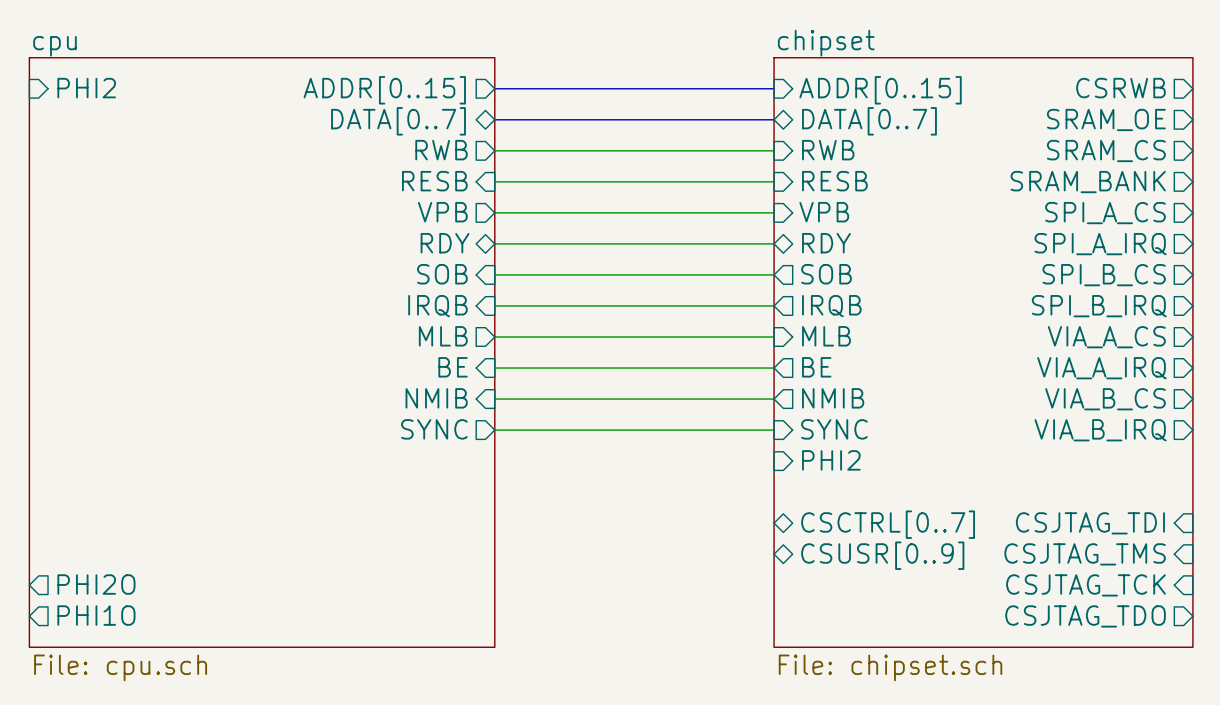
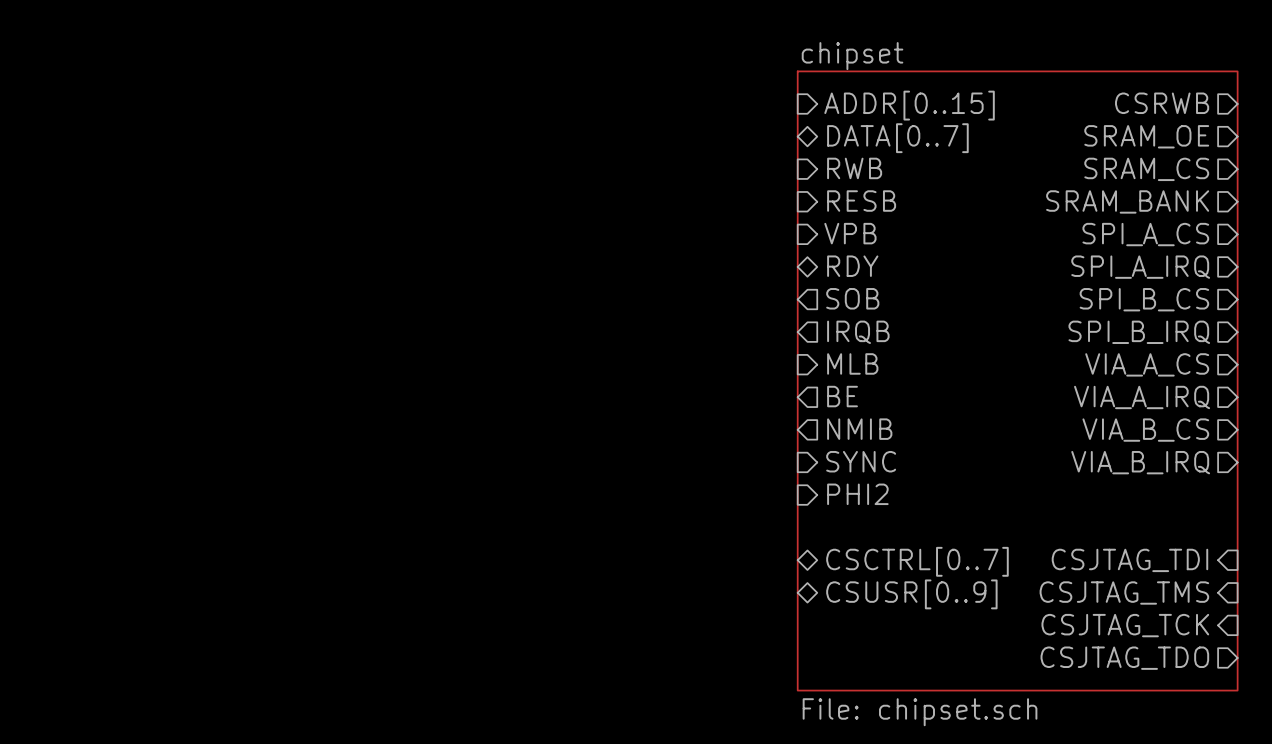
sheet pin: PHI2 (86, 88) -> none
bus: (494, 88) (774, 88) -> none
sheet pin: ADDR[0..15] (384, 90) -> none
bus: (494, 119) (774, 119) -> none
sheet pin: DATA[0..7] (398, 121) -> none
sheet pin: RWB (441, 150) -> none
wire: (494, 150) (774, 150) -> none
sheet pin: RESB (434, 181) -> none
wire: (494, 181) (774, 181) -> none
sheet pin: VPB (442, 212) -> none
wire: (494, 212) (774, 212) -> none
sheet pin: RDY (445, 243) -> none
wire: (494, 243) (774, 243) -> none
sheet pin: SOB (442, 274) -> none
wire: (494, 274) (774, 274) -> none
wire: (494, 305) (774, 305) -> none
sheet pin: IRQB (437, 306) -> none
sheet pin: MLB (443, 336) -> none
wire: (494, 336) (774, 336) -> none
sheet cpu: File: cpu.sch (262, 352) -> none
sheet pin: BE (453, 367) -> none
wire: (494, 368) (774, 368) -> none
sheet pin: NMIB (436, 398) -> none
wire: (494, 399) (774, 399) -> none
sheet pin: SYNC (434, 429) -> none
wire: (494, 430) (774, 430) -> none
sheet pin: PHI2O (96, 584) -> none
sheet pin: PHI1O (96, 615) -> none

